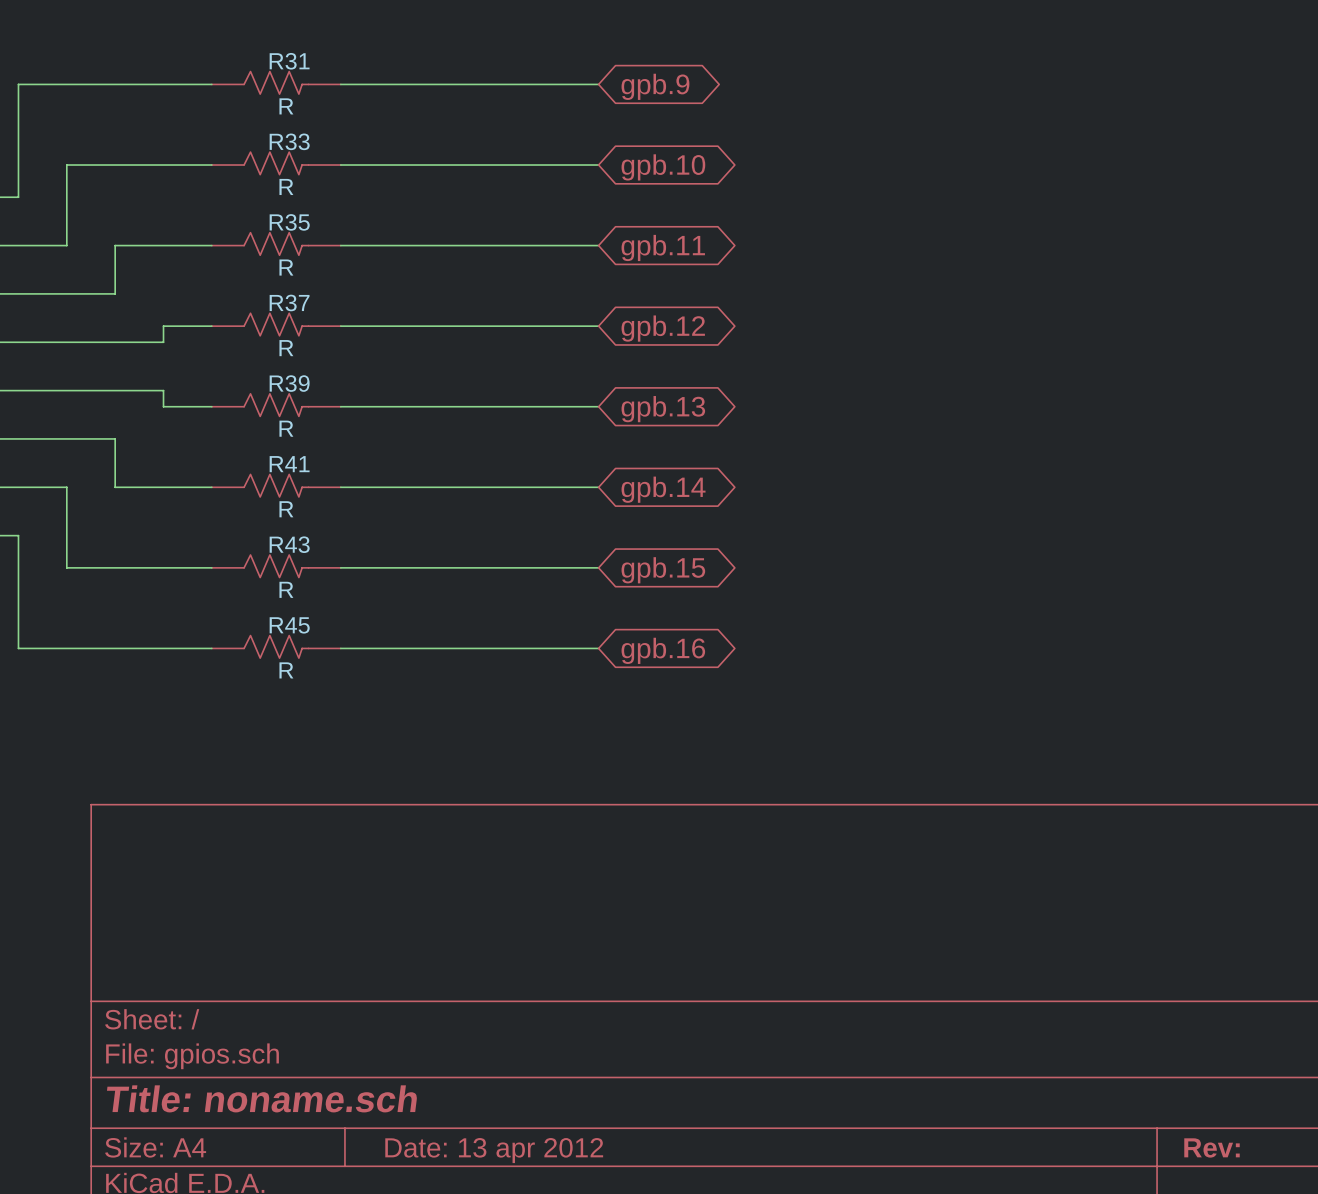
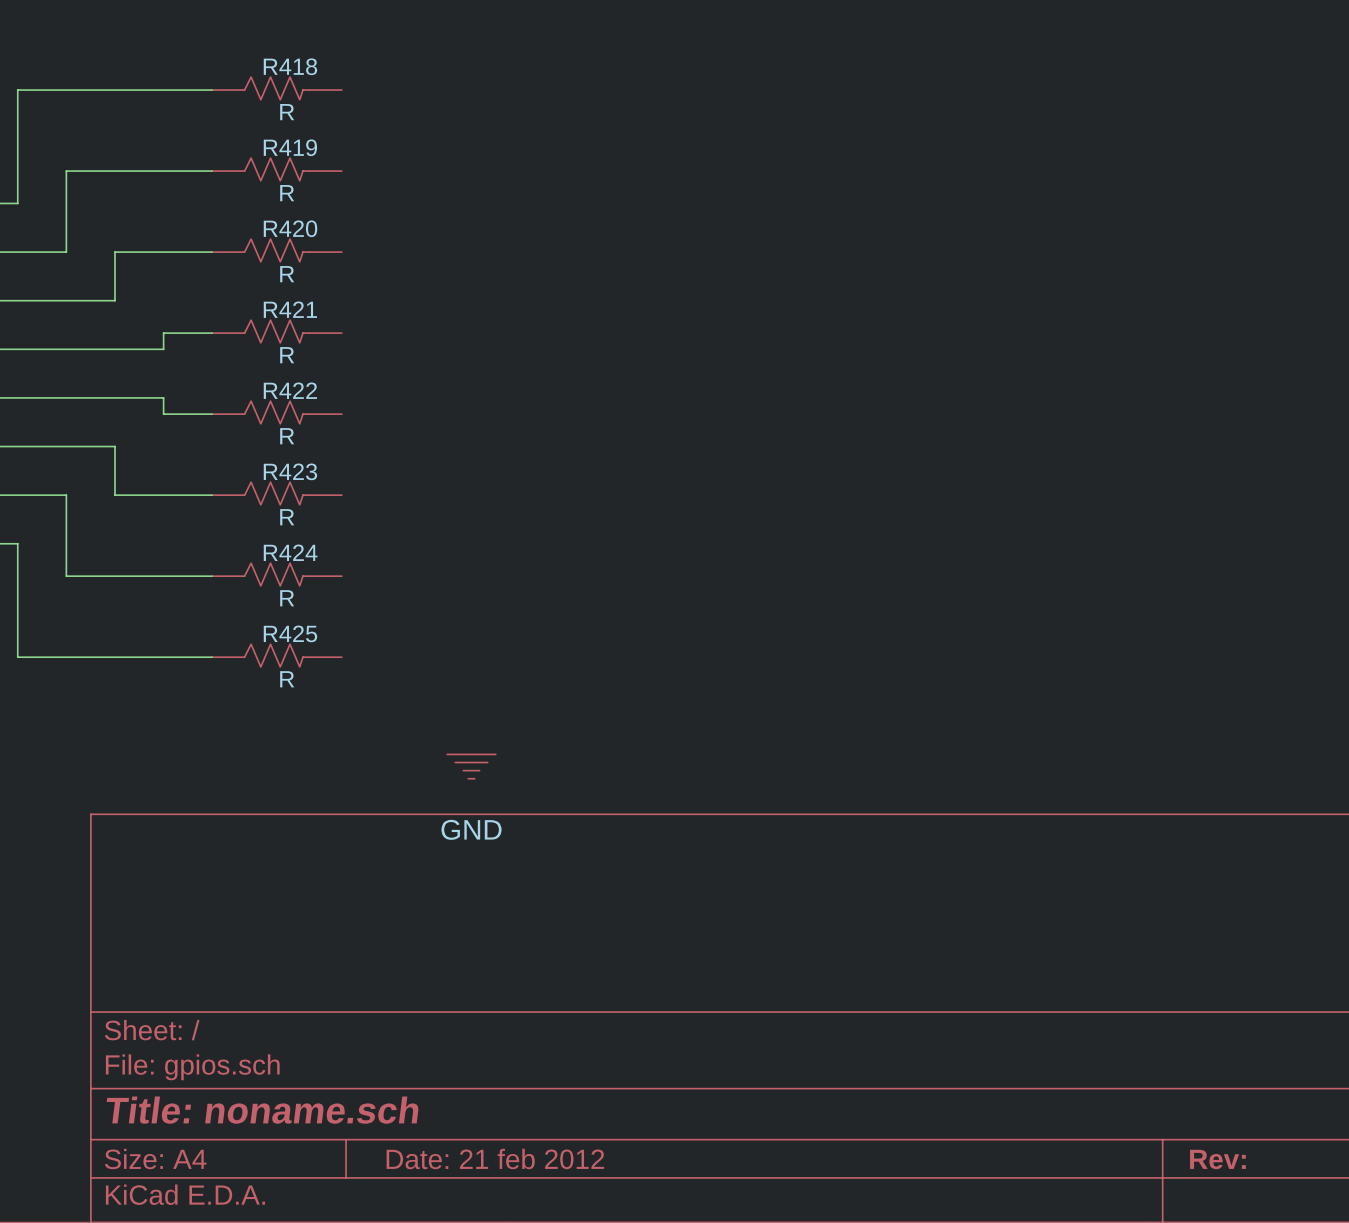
R31 name: R31 (289, 61) -> R418 (290, 66)
wire: (340, 84) (598, 84) -> none
global label: gpb.9 (655, 86) -> none
R33 name: R33 (289, 141) -> R419 (290, 147)
wire: (340, 165) (598, 165) -> none
global label: gpb.10 (663, 167) -> none
R35 name: R35 (289, 222) -> R420 (290, 228)
wire: (340, 245) (598, 245) -> none
global label: gpb.11 (663, 247) -> none
R37 name: R37 (289, 302) -> R421 (290, 309)
wire: (340, 326) (598, 326) -> none
global label: gpb.12 (663, 328) -> none
R39 name: R39 (289, 383) -> R422 (290, 390)
wire: (340, 406) (598, 406) -> none
global label: gpb.13 (663, 409) -> none
R41 name: R41 (289, 464) -> R423 (290, 471)
wire: (340, 487) (598, 487) -> none
global label: gpb.14 (663, 489) -> none
R43 name: R43 (289, 544) -> R424 (290, 552)
wire: (340, 567) (598, 567) -> none
global label: gpb.15 (663, 570) -> none
R45 name: R45 (289, 625) -> R425 (290, 633)
wire: (340, 648) (598, 648) -> none
global label: gpb.16 (663, 650) -> none
power symbol: none -> GND (471, 766)
title block: Date: 13 apr 2012 (494, 1150) -> Date: 21 feb 2012 (495, 1158)

